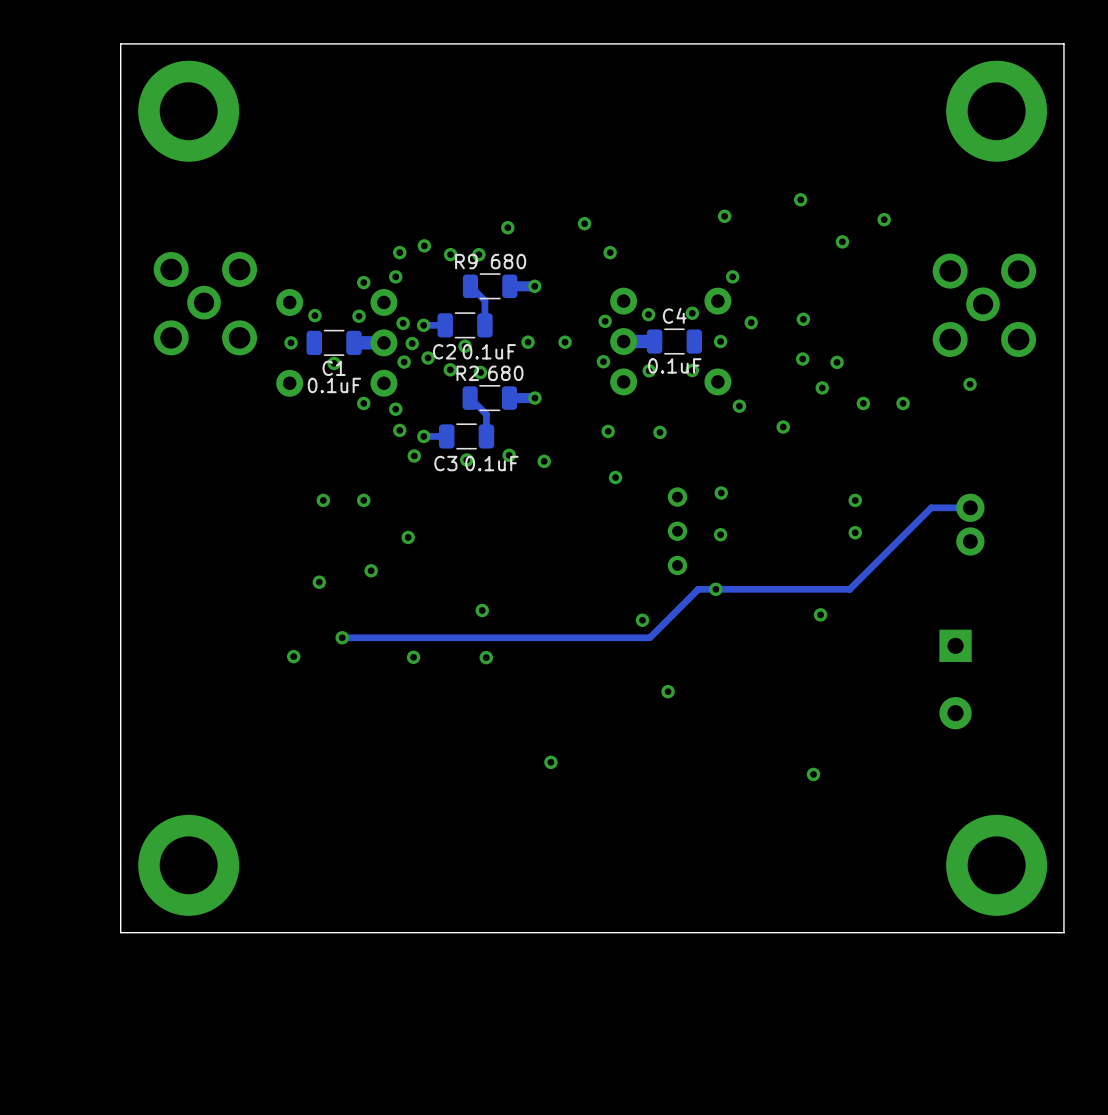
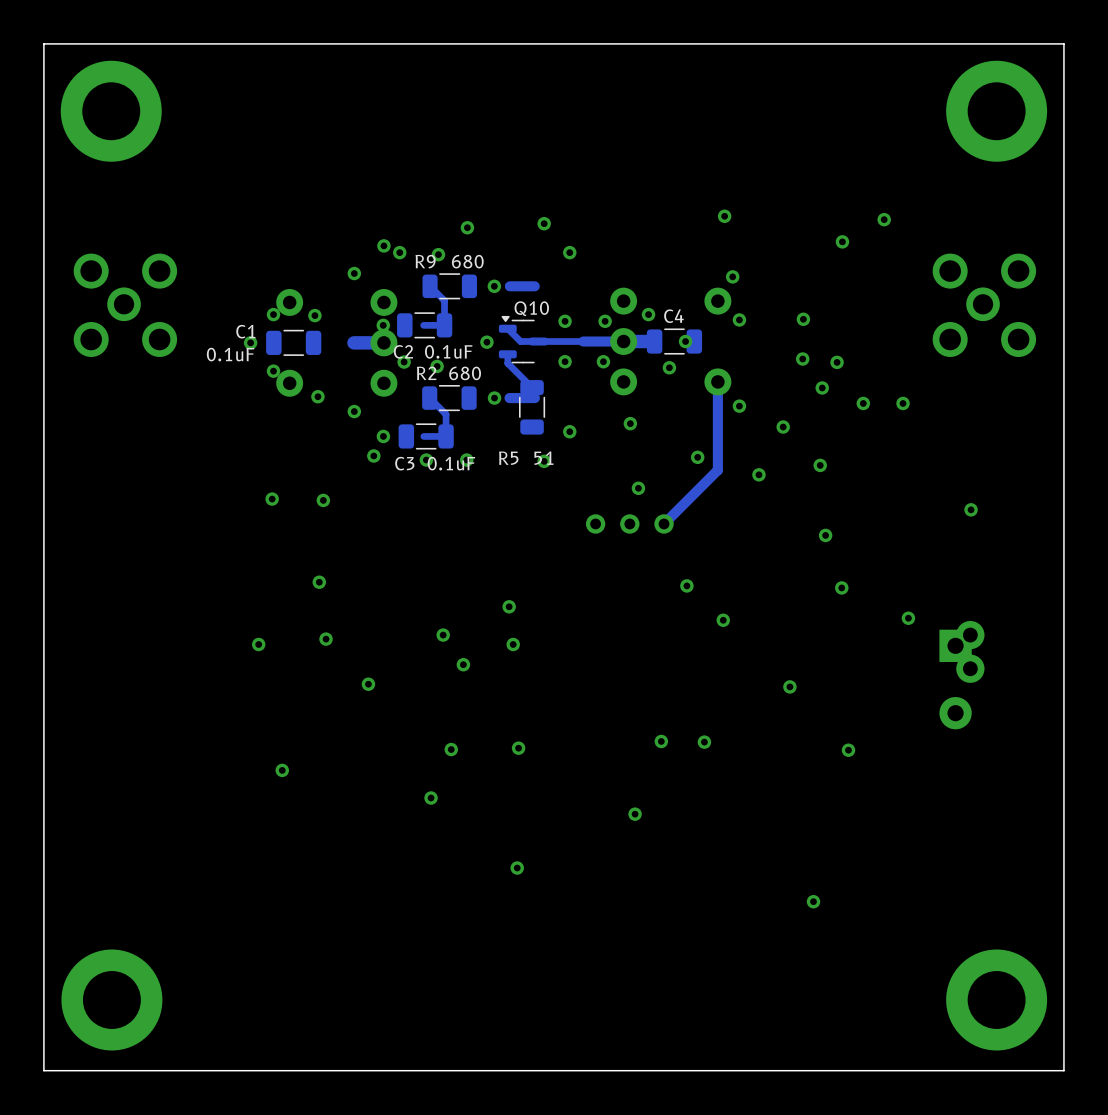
board edge: (120, 43) (120, 932) (1063, 932) -> (120, 43) (43, 43) (43, 1070) (1063, 1070) (1063, 932)
part position: (188, 111) -> (111, 111)
via: (800, 199) -> none
via: none -> (544, 223)
via: (584, 223) -> none
via: none -> (467, 227)
via: (507, 227) -> none
via: none -> (383, 245)
via: (424, 245) -> none
via: none -> (569, 252)
via: (610, 252) -> none
via position: (450, 254) -> (438, 254)
via: (478, 254) -> none
via: (395, 276) -> none
via position: (363, 282) -> (354, 273)
track: (470, 286) (484, 300) (484, 325) -> (430, 286) (444, 300) (444, 325)
R9 position: (490, 286) -> (449, 286)
via: none -> (494, 286)
via: (534, 286) -> none
part position: (205, 303) -> (125, 305)
via: (692, 313) -> none
via: none -> (273, 314)
via: (359, 316) -> none
via: none -> (565, 321)
via position: (751, 322) -> (739, 319)
via: (403, 323) -> none
via: none -> (383, 325)
via: (423, 325) -> none
C2 position: (465, 325) -> (424, 325)
track: none -> (507, 328) (520, 341) (617, 341)
Q10: none -> (523, 339)
via: none -> (685, 341)
via: (720, 341) -> none
via: none -> (250, 342)
via: (291, 342) -> none
C1 position: (334, 342) -> (293, 342)
via: none -> (486, 342)
via: (528, 342) -> none
via: (565, 342) -> none
via: (412, 343) -> none
via: (465, 346) -> none
track: none -> (507, 354) (507, 363) (532, 387)
via: (428, 358) -> none
via: none -> (565, 361)
via: (334, 363) -> none
C4 value: 0.1uF (674, 365) -> none
via: none -> (437, 366)
via: none -> (669, 367)
C1 name position: C1 (334, 368) -> C1 (245, 331)
via: (450, 369) -> none
via: (649, 370) -> none
via: (692, 370) -> none
via: none -> (273, 371)
via: (480, 372) -> none
track: none -> (717, 381) (717, 470) (664, 523)
via: (970, 384) -> none
C1 value position: 0.1uF (334, 385) -> 0.1uF (230, 354)
via: none -> (317, 396)
track: (470, 398) (486, 414) (486, 436) -> (429, 398) (446, 414) (446, 436)
R2 position: (489, 398) -> (449, 398)
via: none -> (494, 398)
via: (534, 398) -> none
via position: (363, 403) -> (354, 411)
R5: none -> 51 (532, 407)
via: (395, 409) -> none
via: none -> (630, 423)
via: (399, 430) -> none
via: none -> (569, 431)
via: (608, 431) -> none
via: (659, 432) -> none
via: none -> (383, 436)
via: (423, 436) -> none
C3 position: (466, 436) -> (426, 436)
via: none -> (373, 455)
via position: (414, 455) -> (426, 460)
via: (509, 455) -> none
via: none -> (697, 457)
via: none -> (820, 465)
via: none -> (758, 474)
via position: (615, 477) -> (638, 488)
via: (721, 493) -> none
via: none -> (272, 499)
via: (363, 500) -> none
via: (855, 500) -> none
track: (970, 507) (931, 507) (849, 589) (698, 589) (649, 637) (342, 637) -> none
via: none -> (971, 509)
part position: (970, 524) -> (970, 651)
part rotation: 0° (677, 531) -> 90° clockwise (629, 523)
via: (855, 532) -> none
via: (720, 534) -> none
via: none -> (825, 535)
via: (408, 537) -> none
via: (371, 570) -> none
via: none -> (686, 585)
via: none -> (841, 587)
via: (715, 589) -> none
via: none -> (509, 606)
via: (482, 610) -> none
via: (820, 614) -> none
via: none -> (908, 618)
via: (642, 620) -> none
via: none -> (723, 620)
via: none -> (443, 635)
via position: (342, 637) -> (326, 639)
via: none -> (258, 644)
via: none -> (513, 644)
via: (293, 656) -> none
via: (413, 657) -> none
via: (486, 657) -> none
via: none -> (463, 664)
via: none -> (368, 684)
via: none -> (789, 686)
via: (668, 691) -> none
via: none -> (661, 741)
via: none -> (704, 742)
via: none -> (451, 749)
via position: (550, 762) -> (518, 748)
via: none -> (282, 770)
via position: (813, 774) -> (848, 750)
via: none -> (431, 798)
via: none -> (635, 814)
part position: (188, 865) -> (111, 999)
part position: (996, 865) -> (996, 999)
via: none -> (517, 868)
via: none -> (813, 901)

